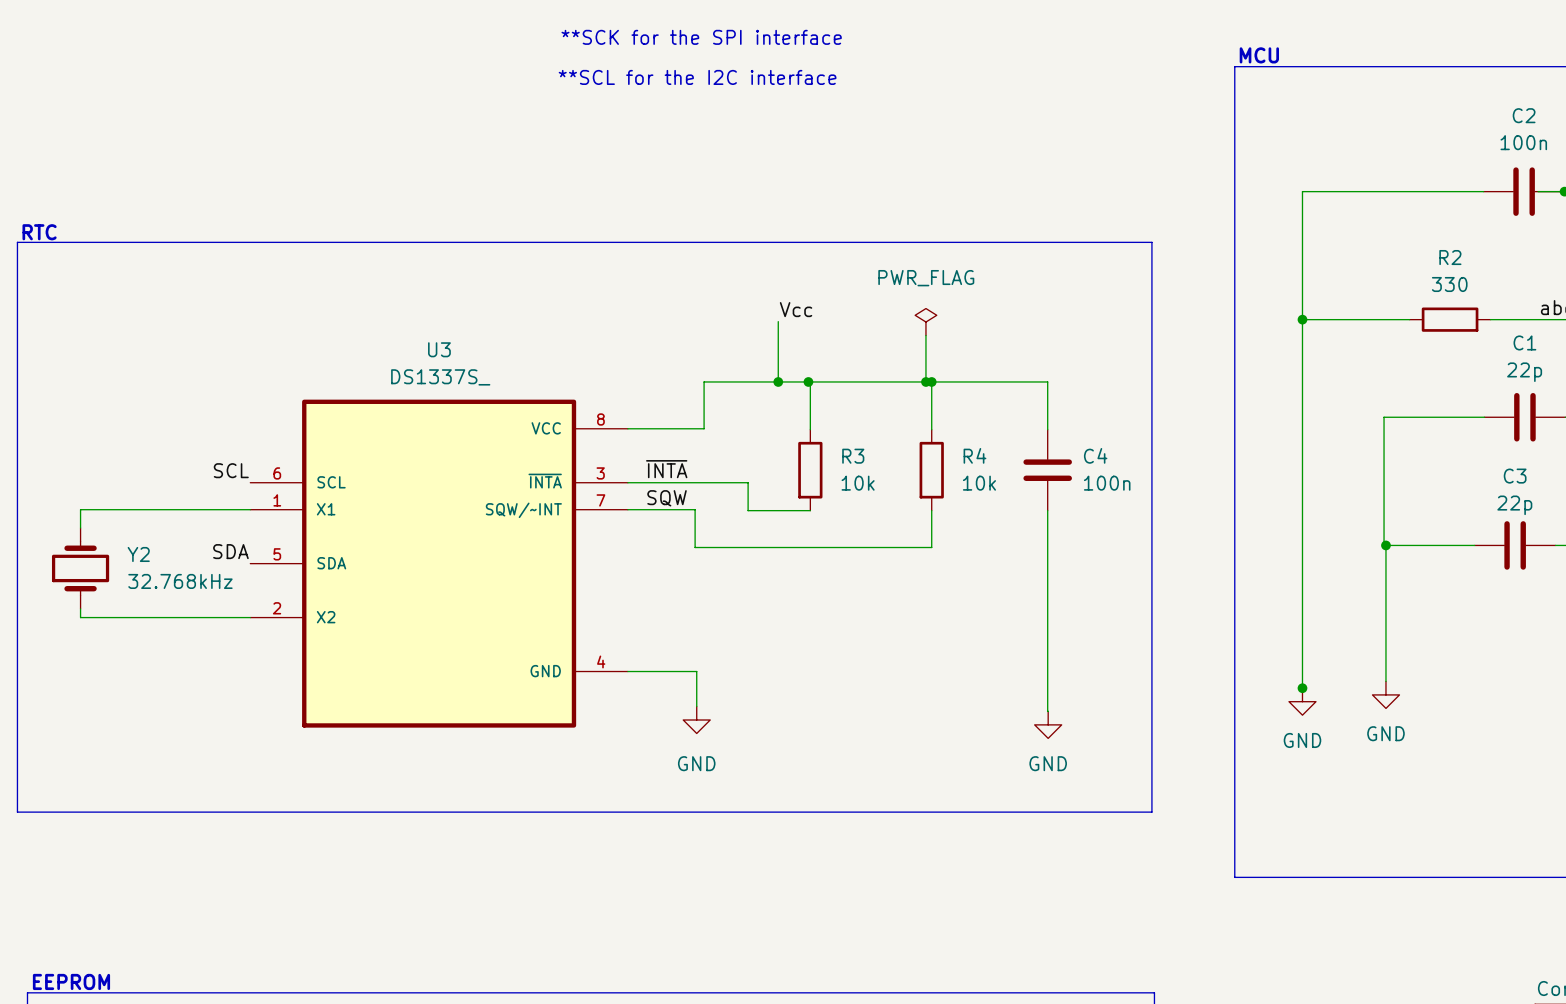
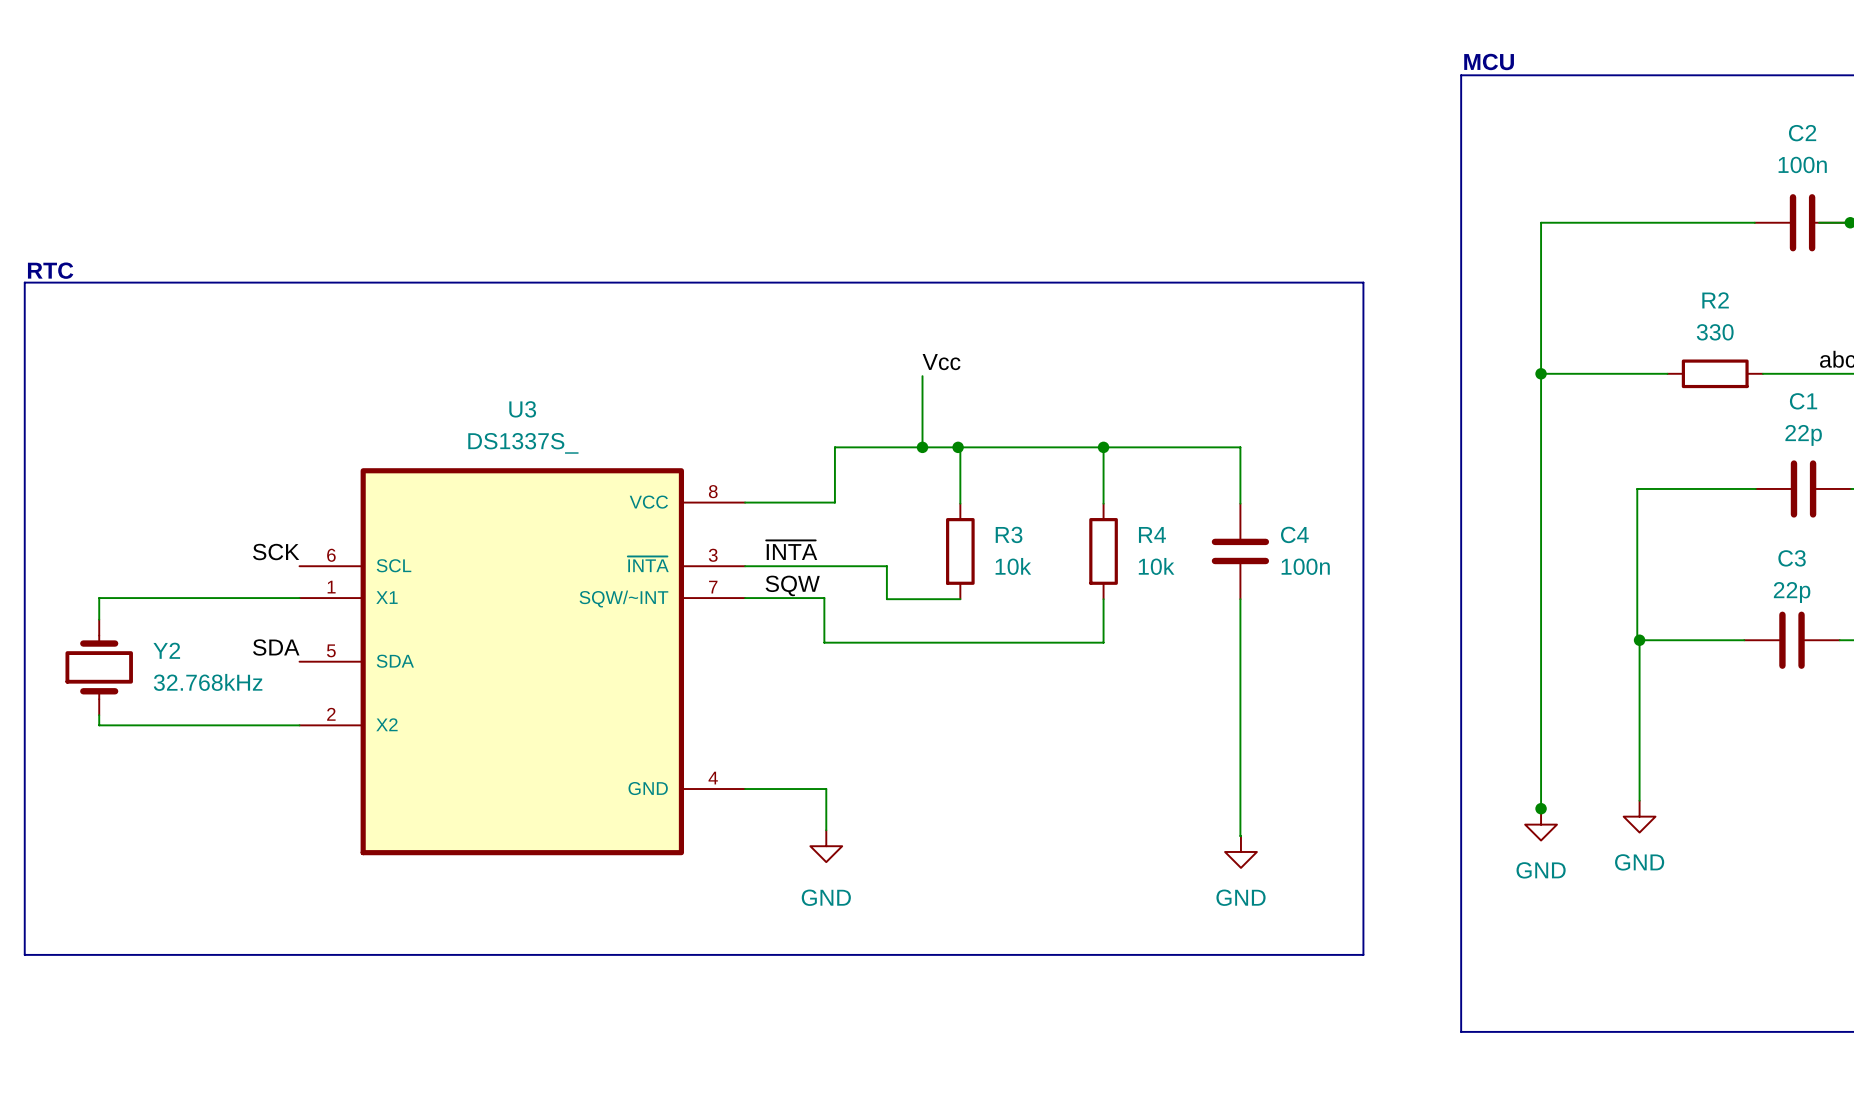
text: **SCK for the SPI interface (701, 37) -> none
text: **SCL for the I2C interface (697, 77) -> none
power symbol: PWR_FLAG (925, 322) -> none
wire: (925, 335) (925, 381) -> none
junction: (925, 381) -> none
label: SCL (231, 470) -> SCK (276, 552)

